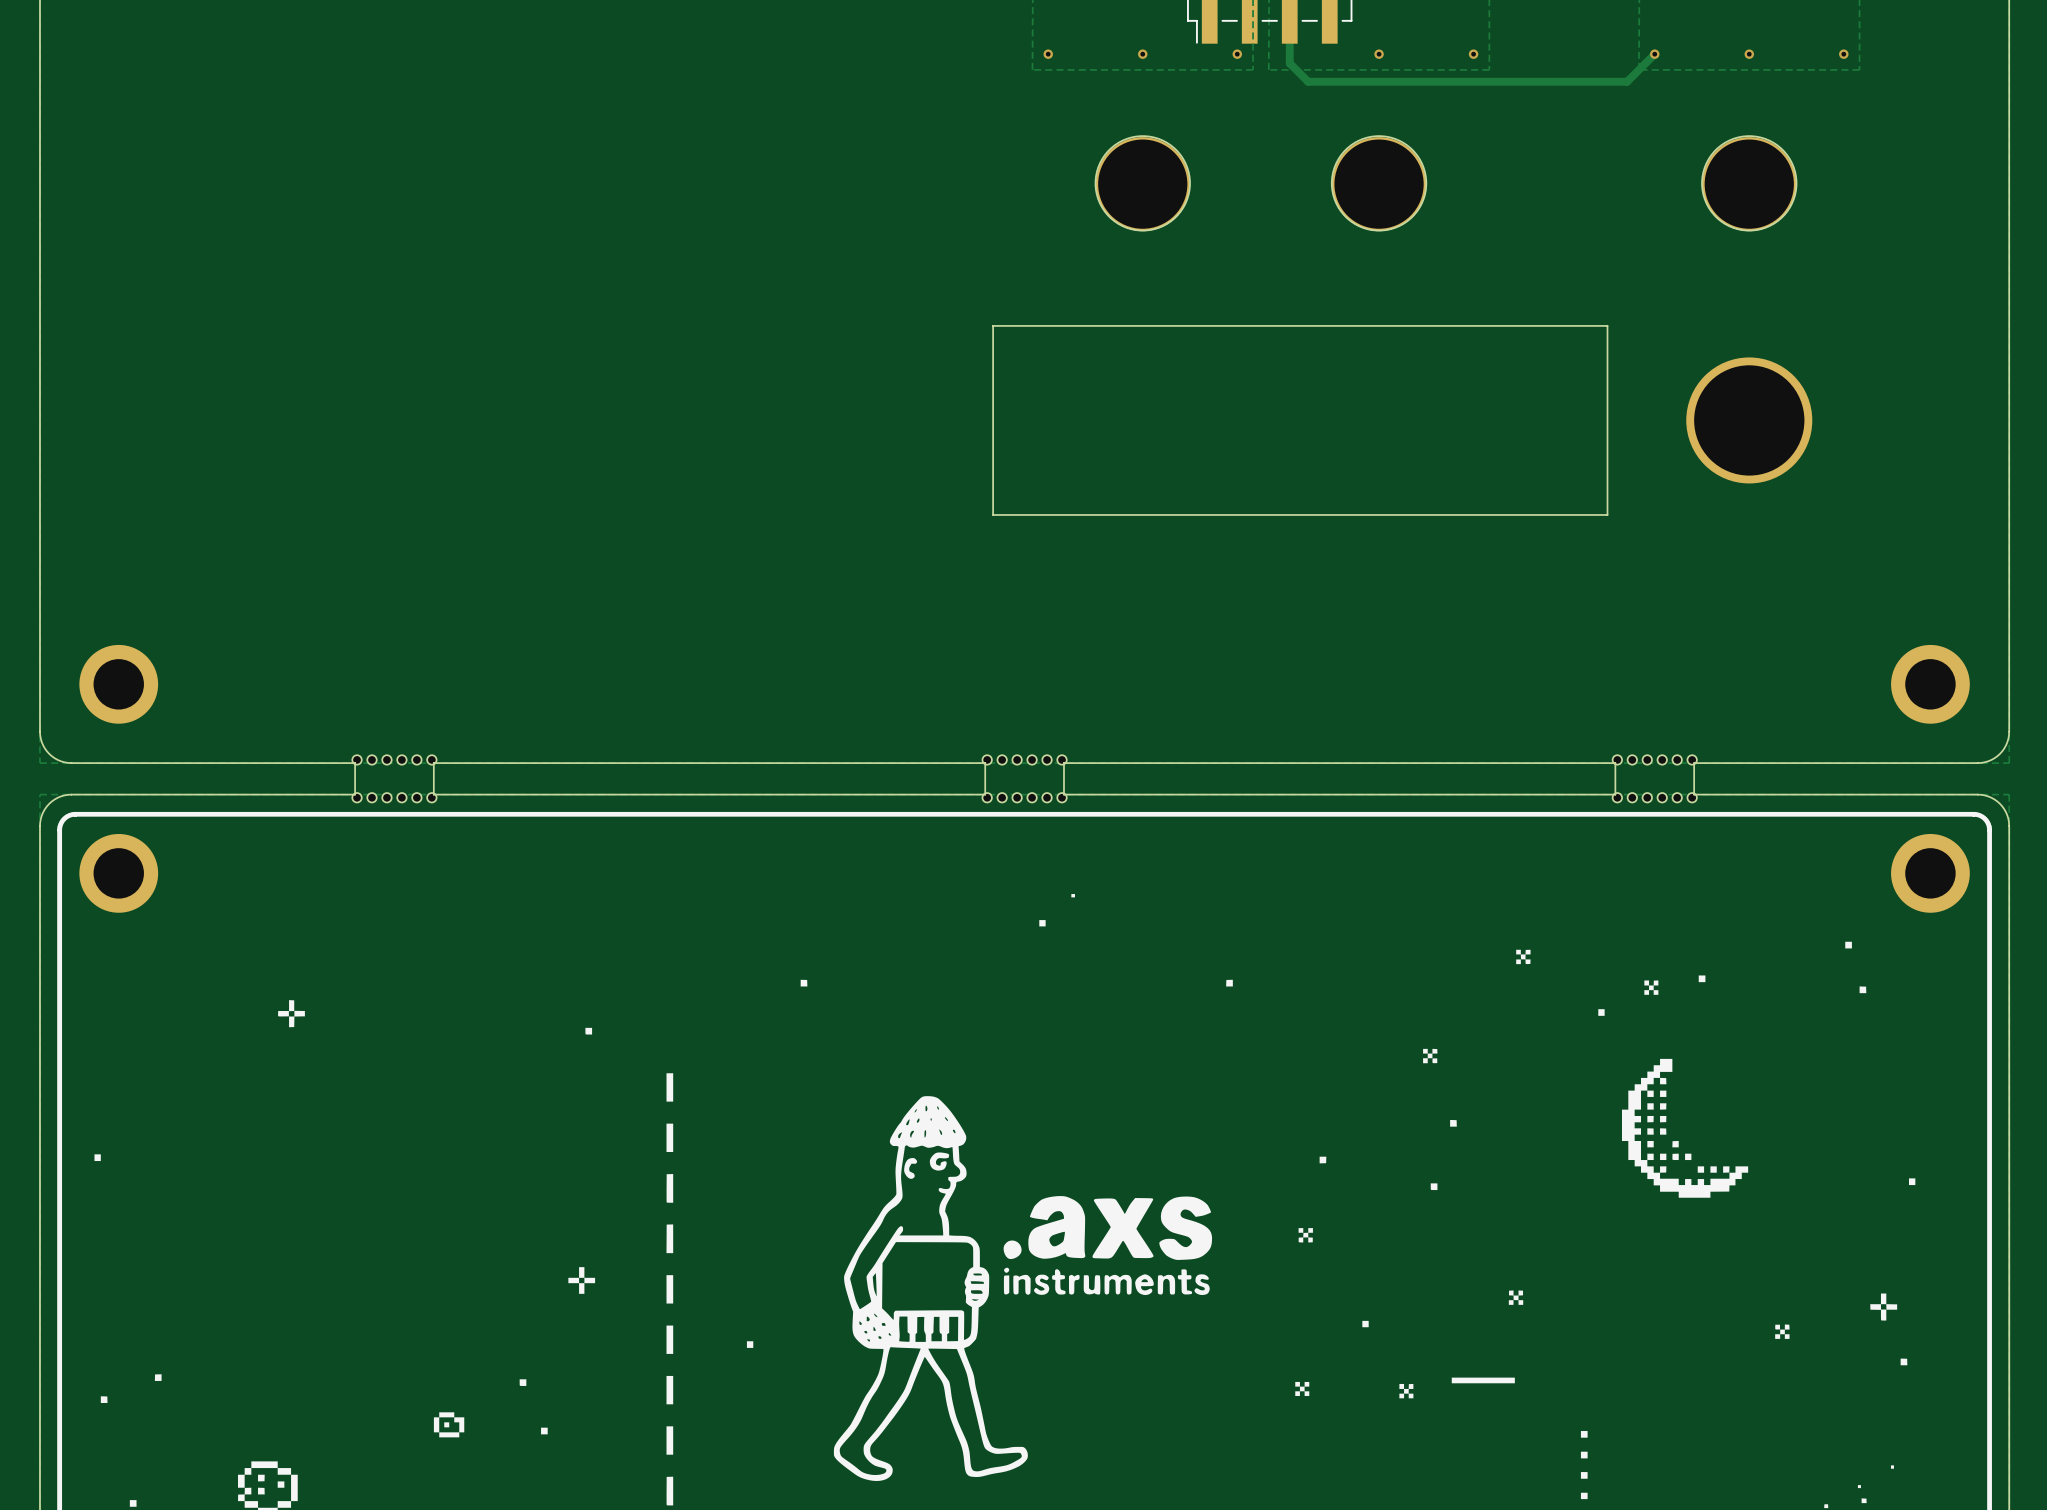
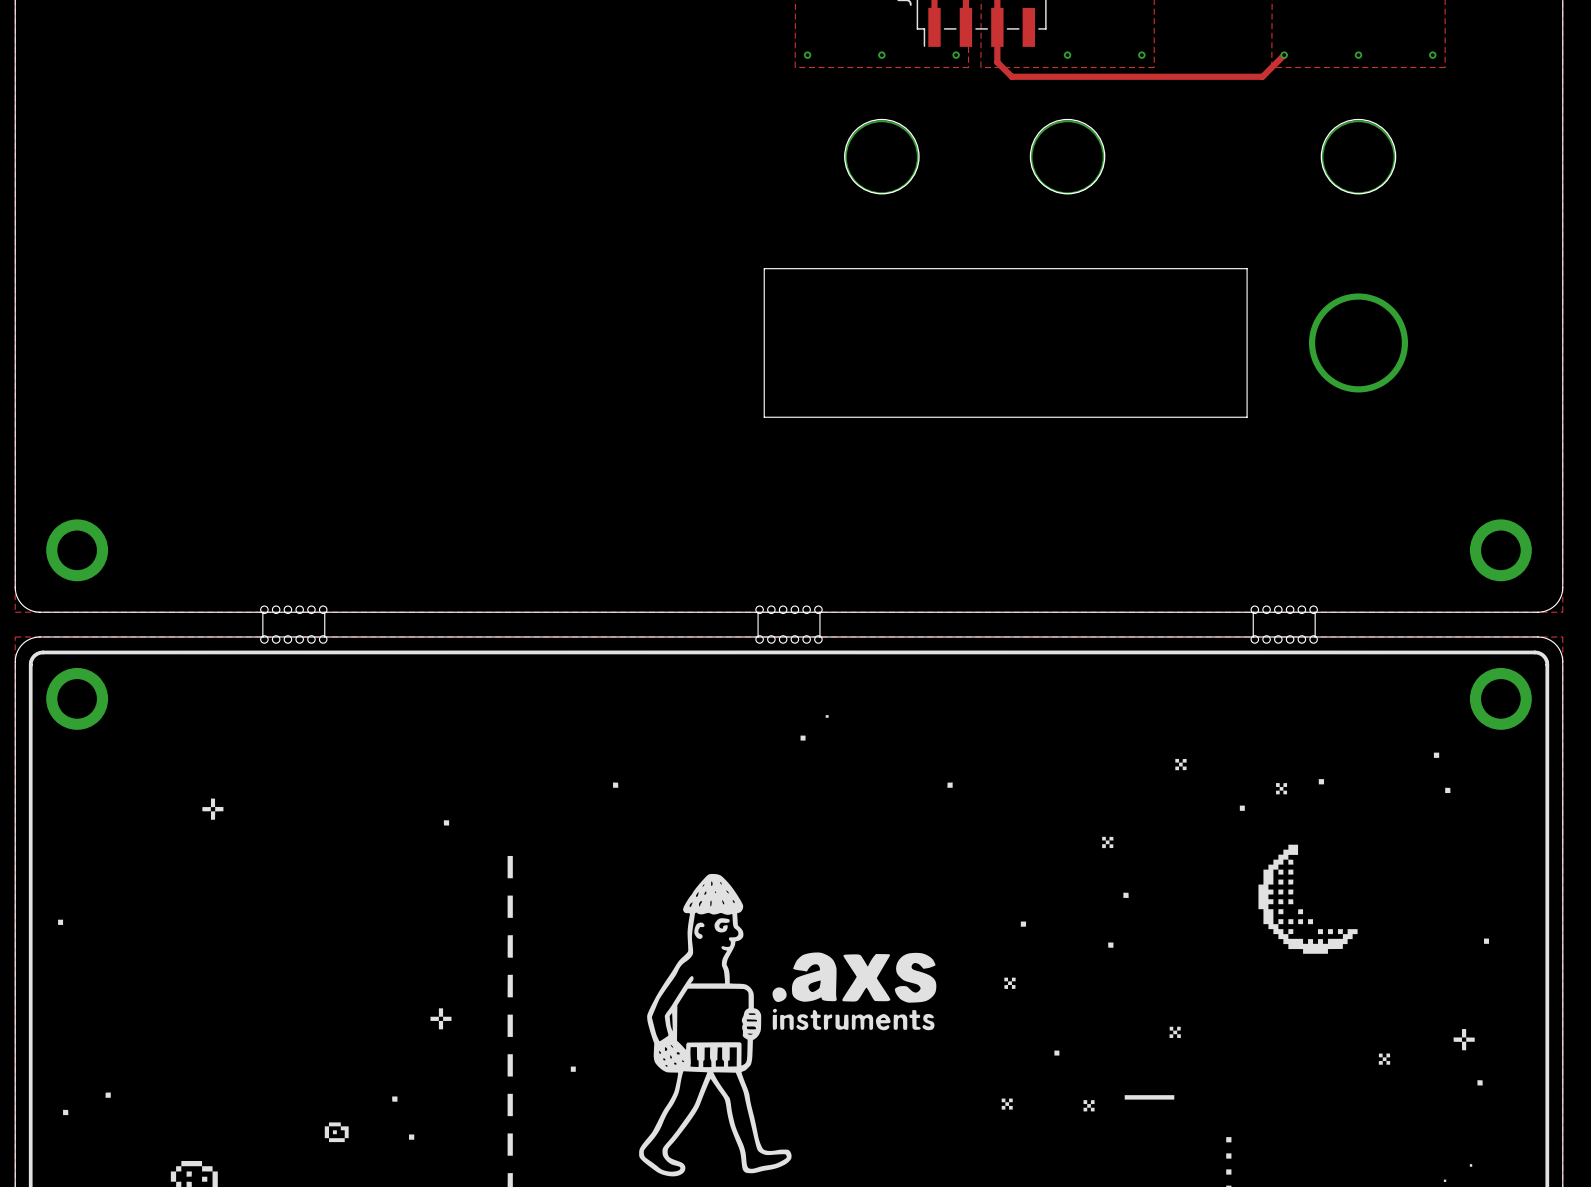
board edge: none -> (262, 612) (324, 612)
board edge: none -> (758, 612) (819, 612)
board edge: none -> (1253, 612) (1315, 612)
board edge: none -> (262, 636) (324, 636)
board edge: none -> (758, 636) (819, 636)
board edge: none -> (1253, 636) (1315, 636)

